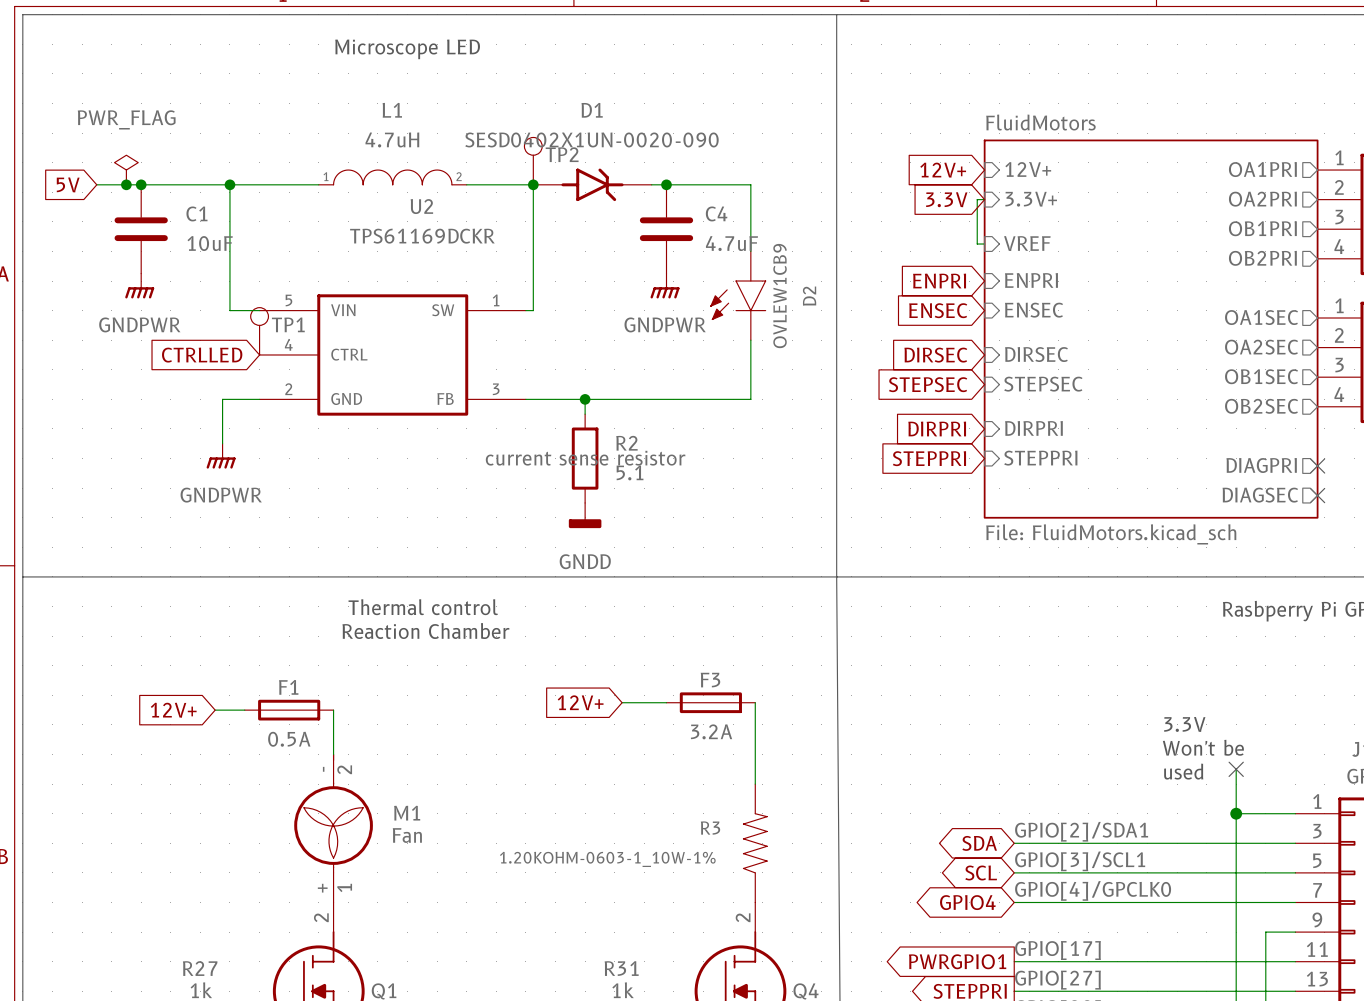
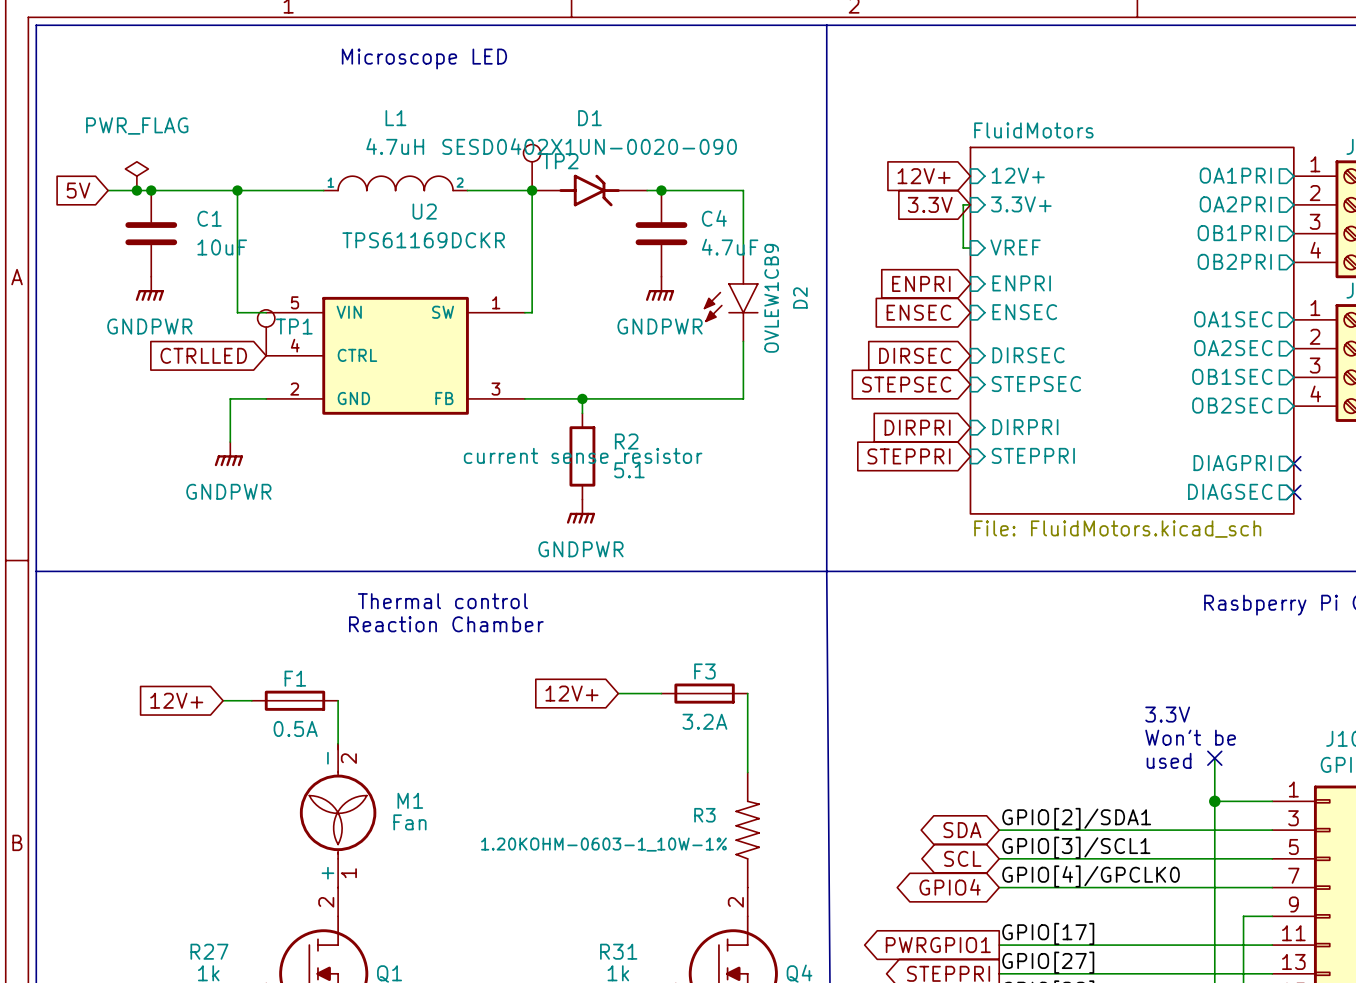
power symbol: GNDD (585, 515) -> GNDPWR (580, 511)

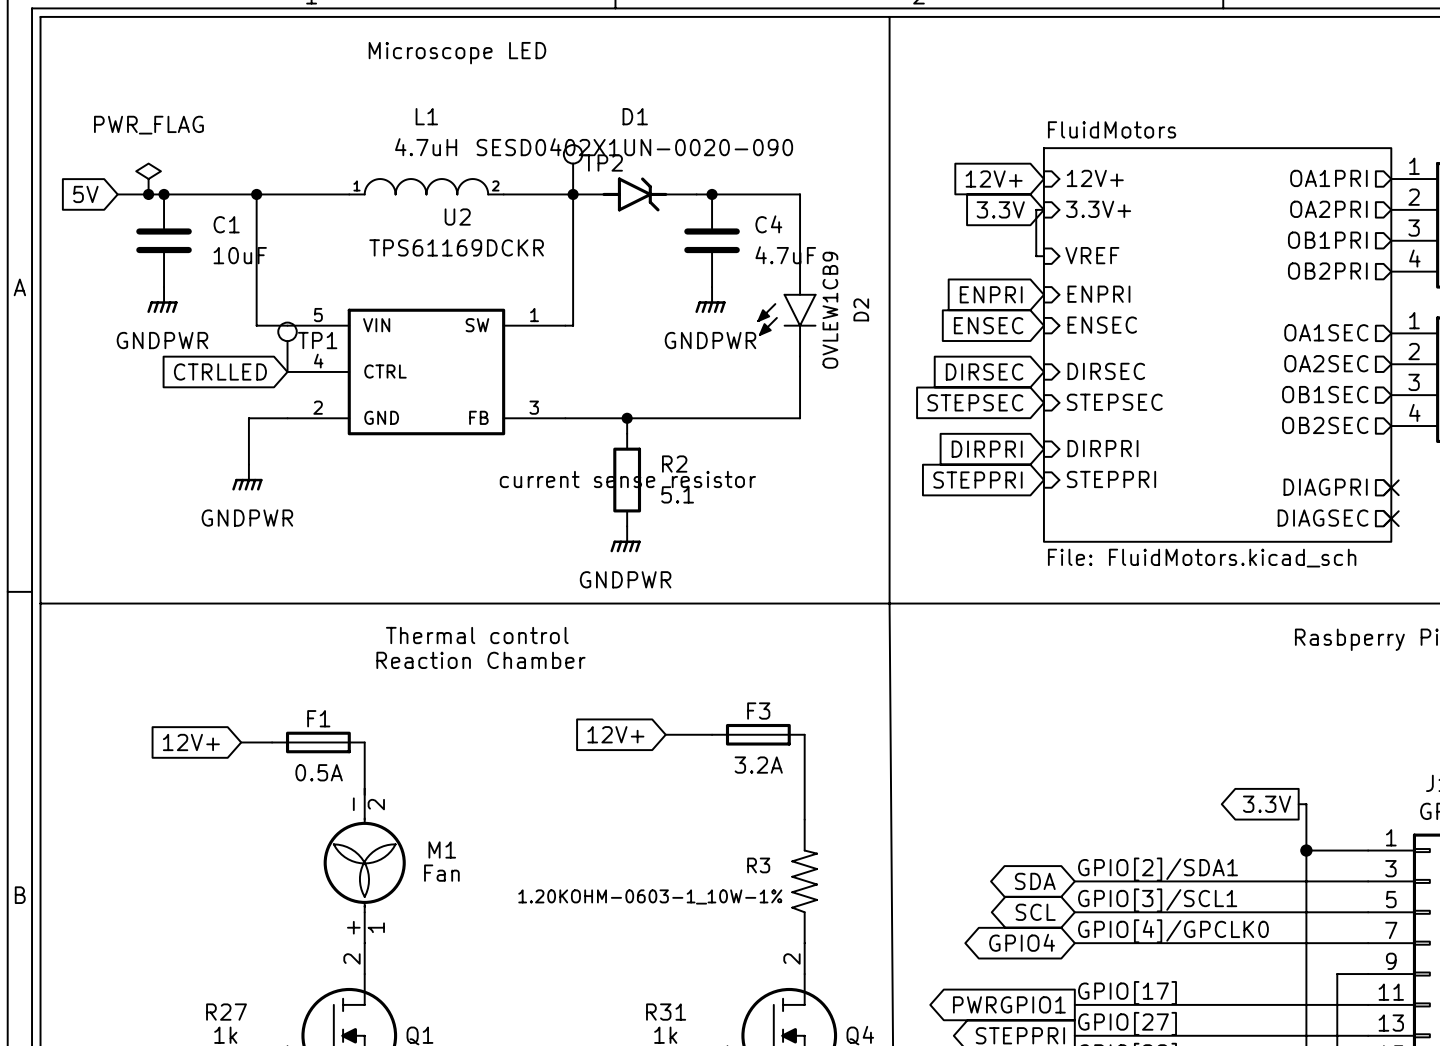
text: 3.3V (1167, 714) -> none
text: Won't be (1190, 737) -> none
global label: none -> 3.3V (1267, 804)
wire: none -> (1298, 804) (1306, 804)
no-connect mark: (1214, 758) -> none
text: used (1169, 760) -> none

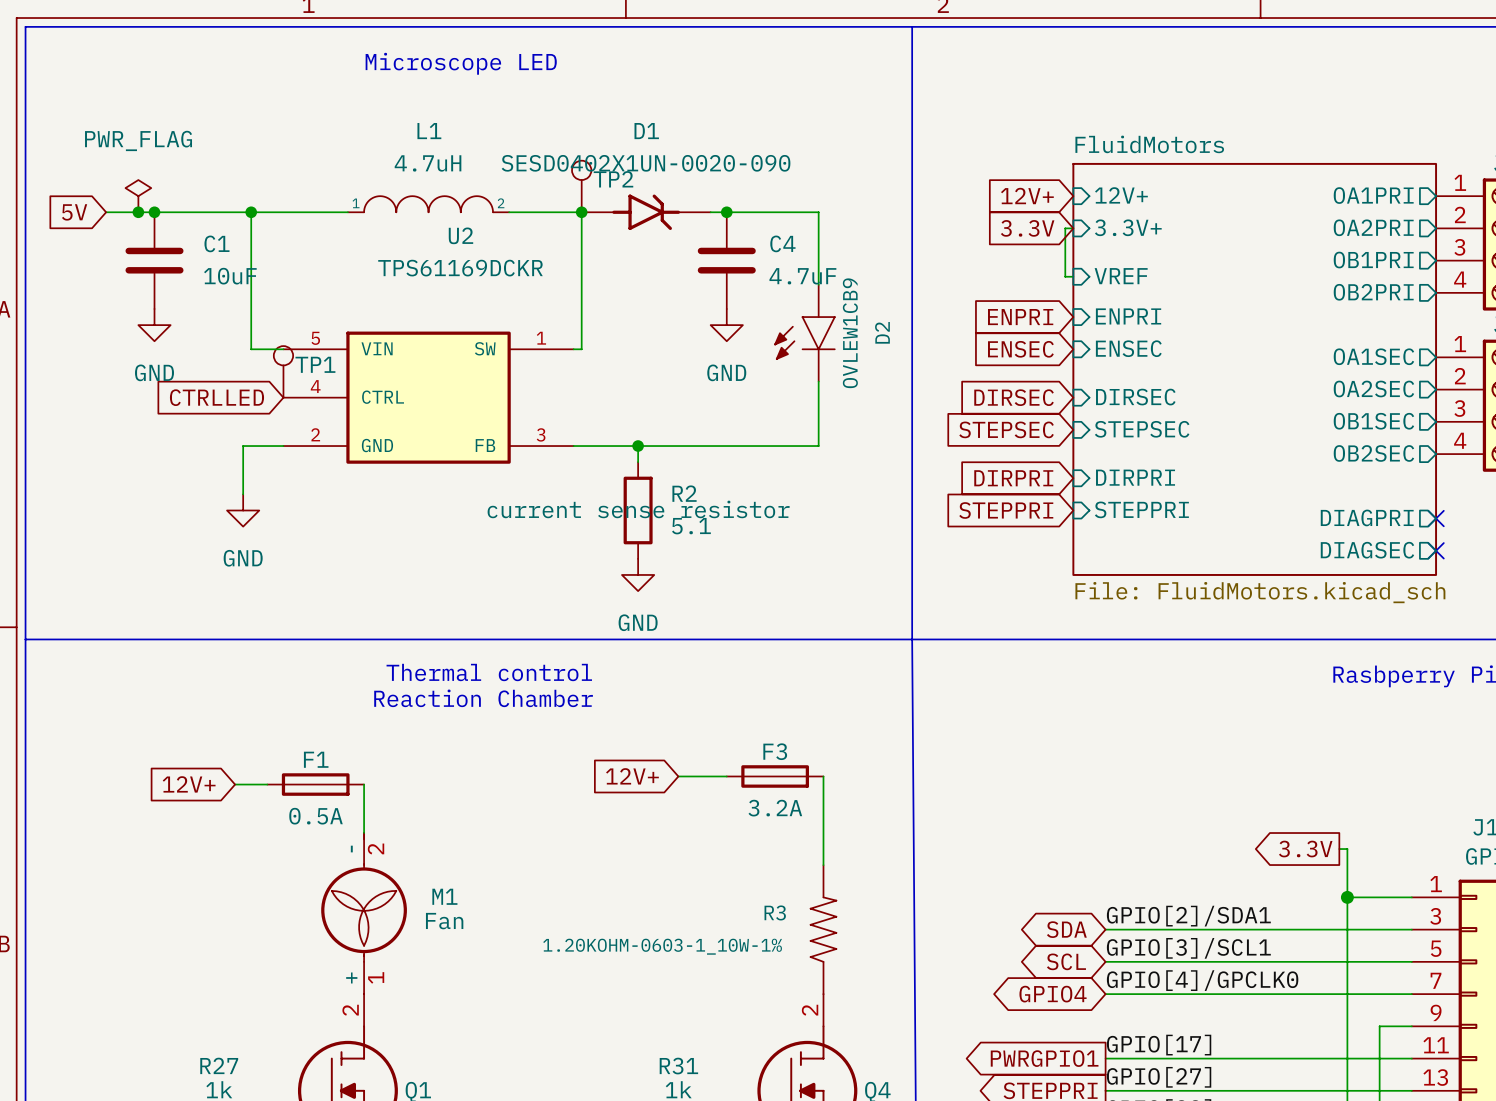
power symbol: GNDPWR (162, 300) -> GND (154, 325)
power symbol: GNDPWR (710, 300) -> GND (726, 325)
power symbol: GNDPWR (247, 477) -> GND (243, 510)
power symbol: GNDPWR (625, 539) -> GND (638, 574)

